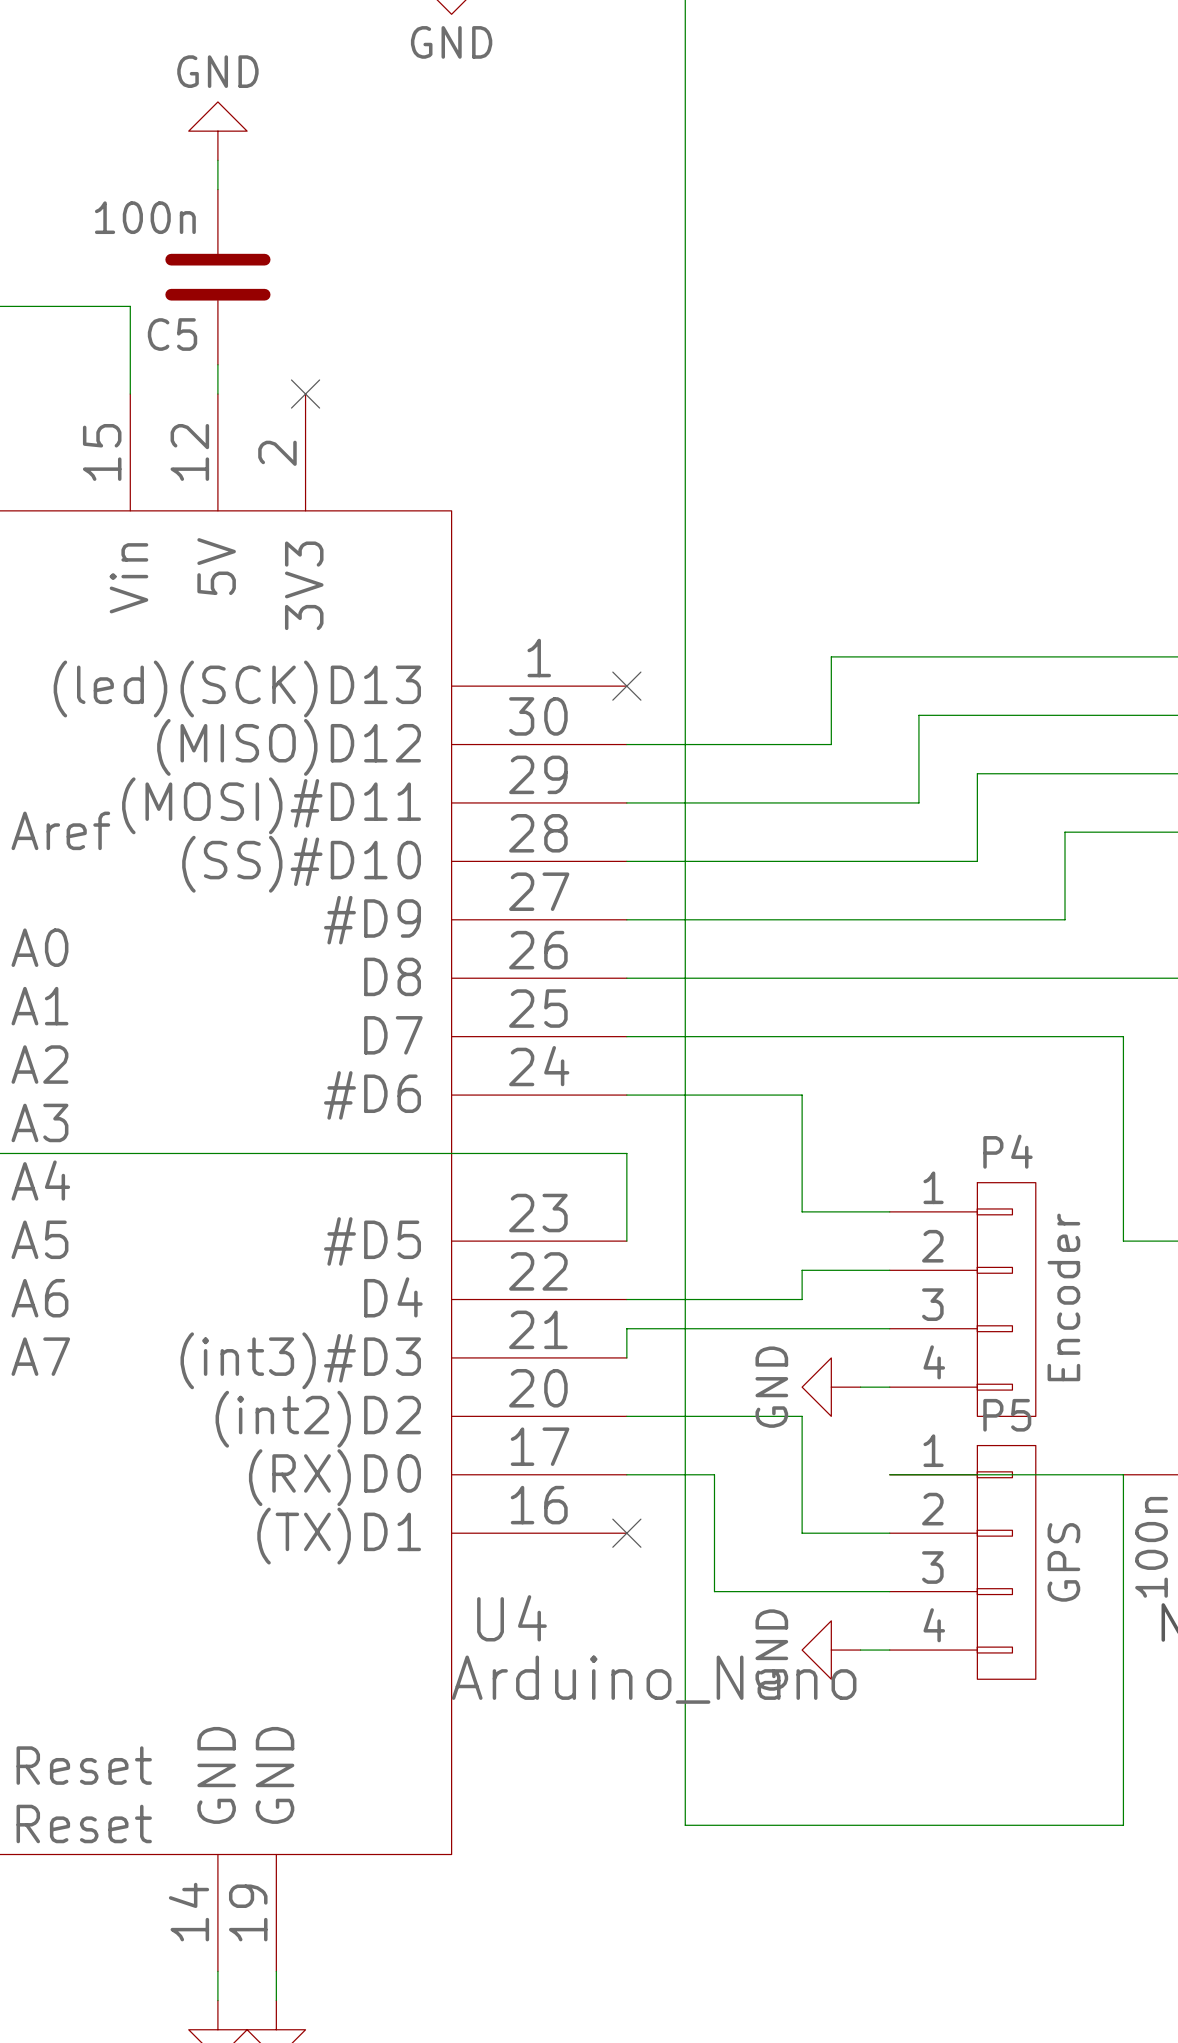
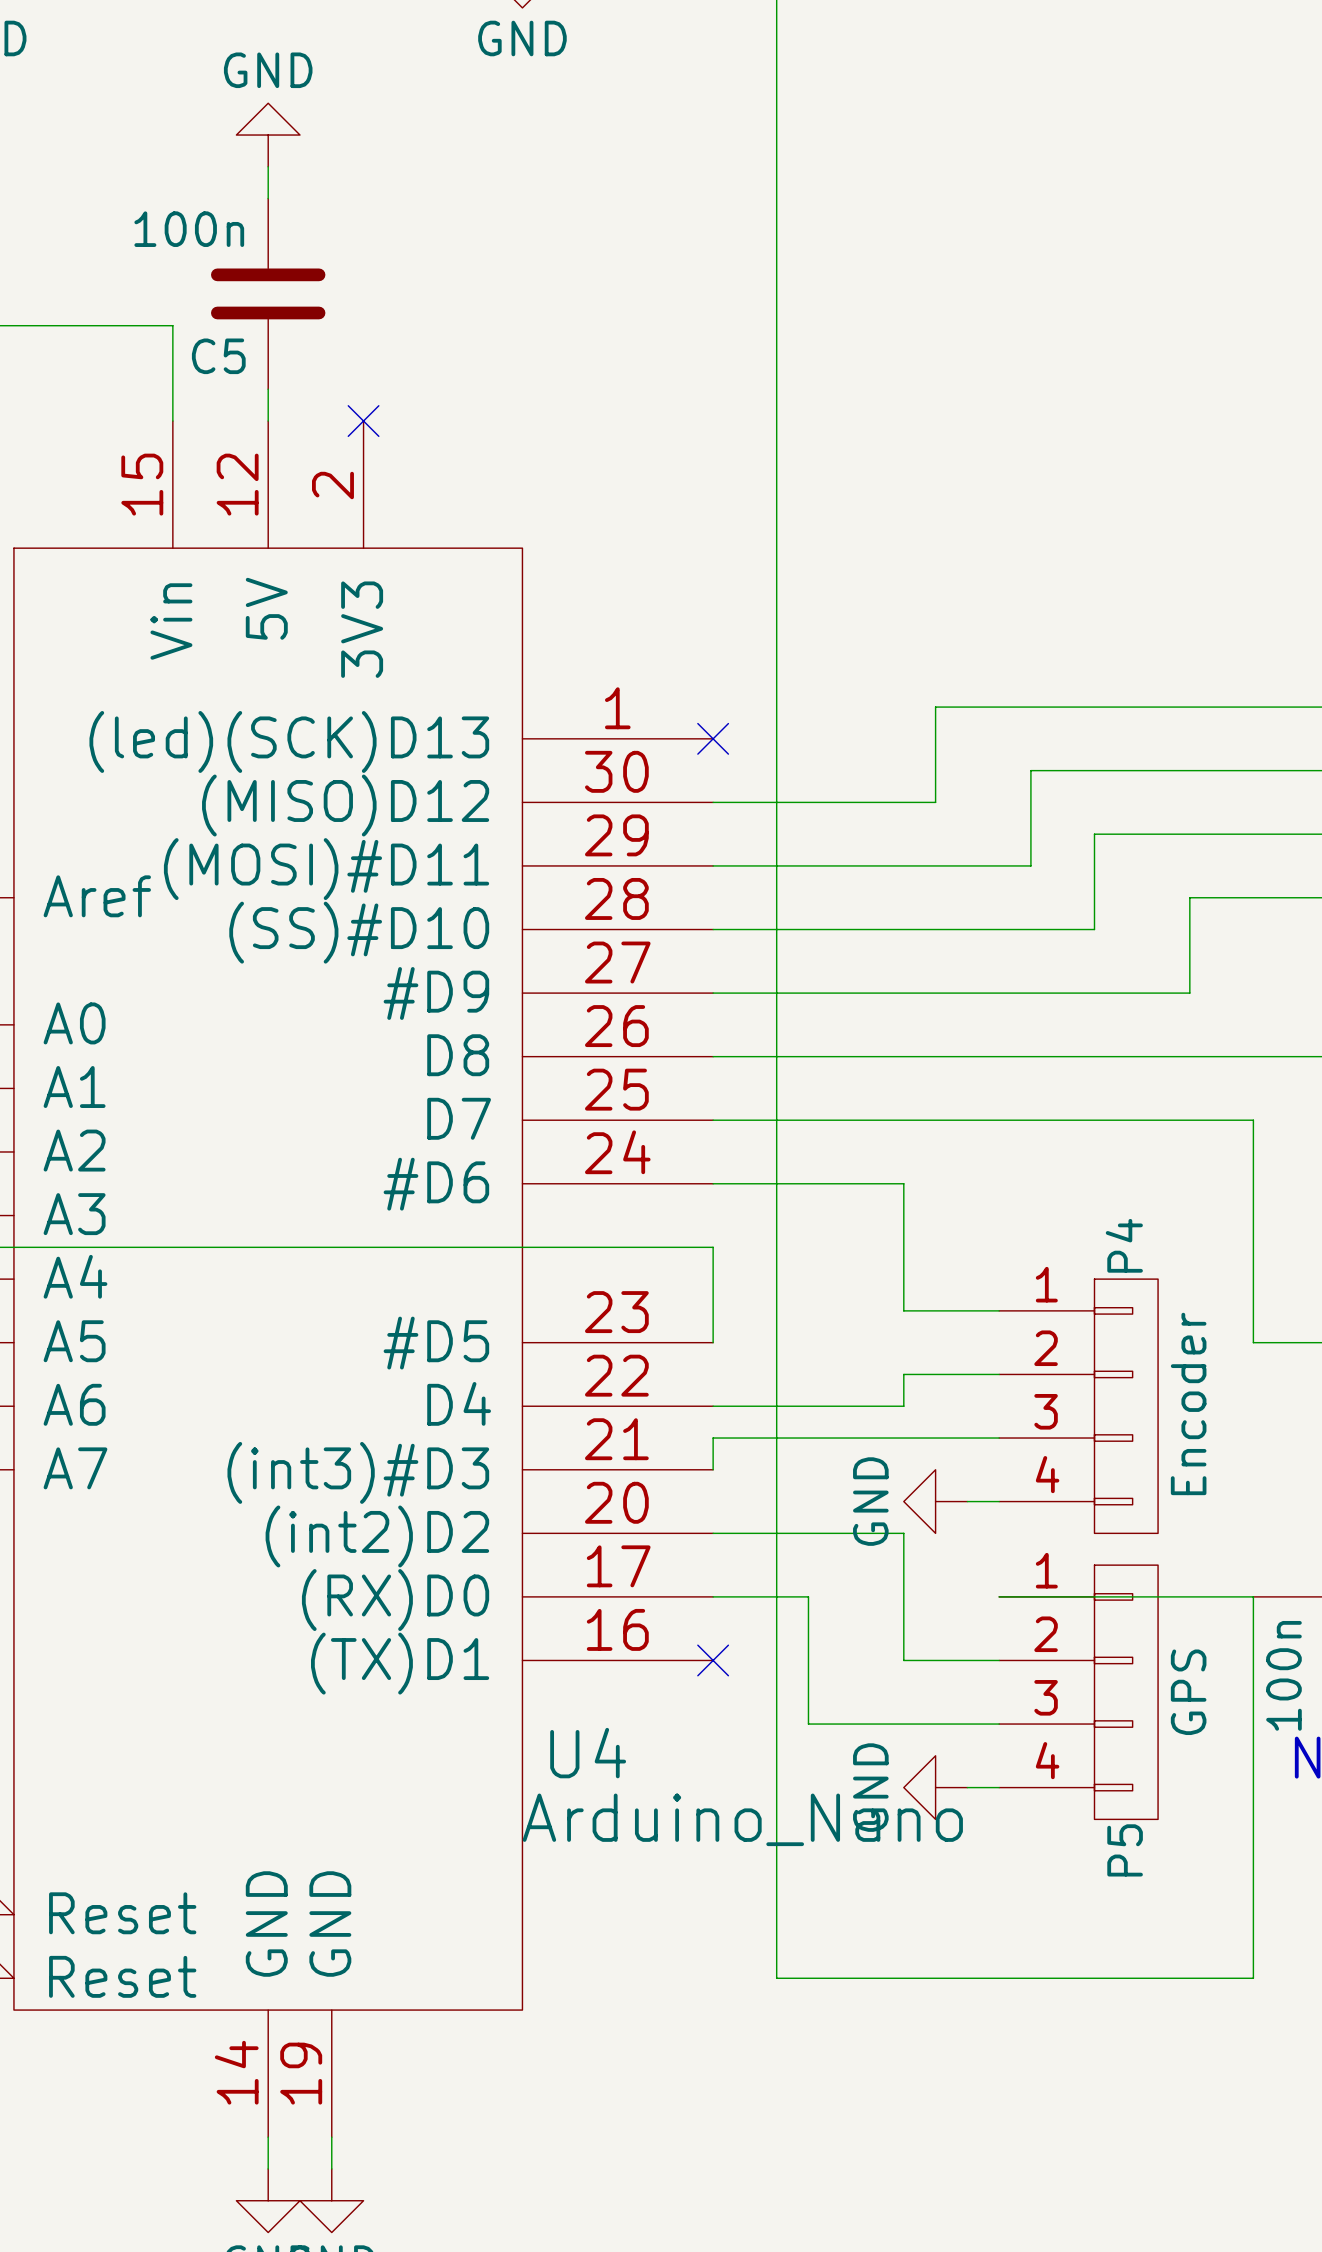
P4 name rotation: 0° (1007, 1151) -> 90° counterclockwise (1124, 1245)
P5 name rotation: 0° (1007, 1415) -> 90° counterclockwise (1125, 1850)
P5 name position: P5 (1007, 1415) -> P5 (1125, 1850)

